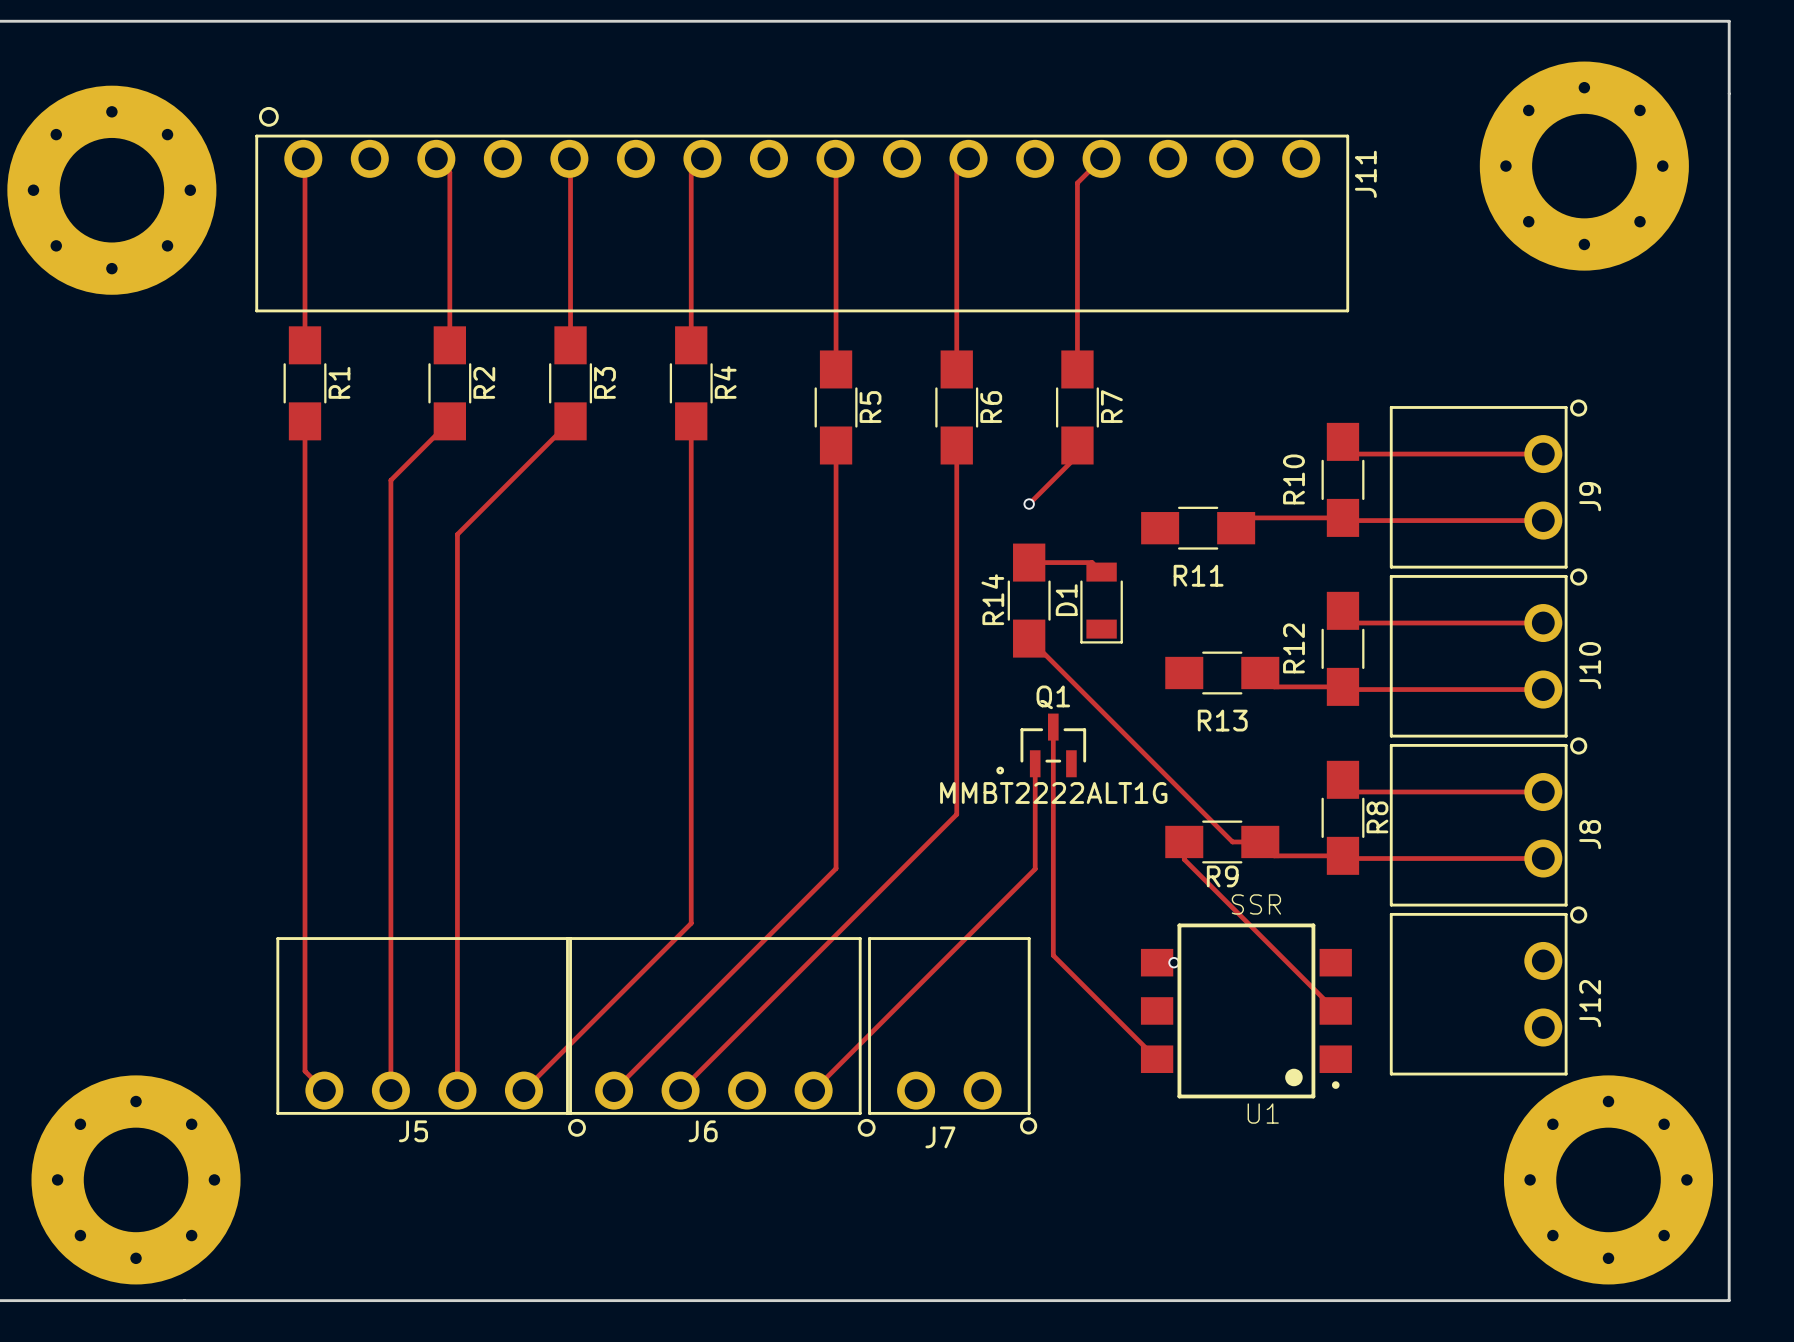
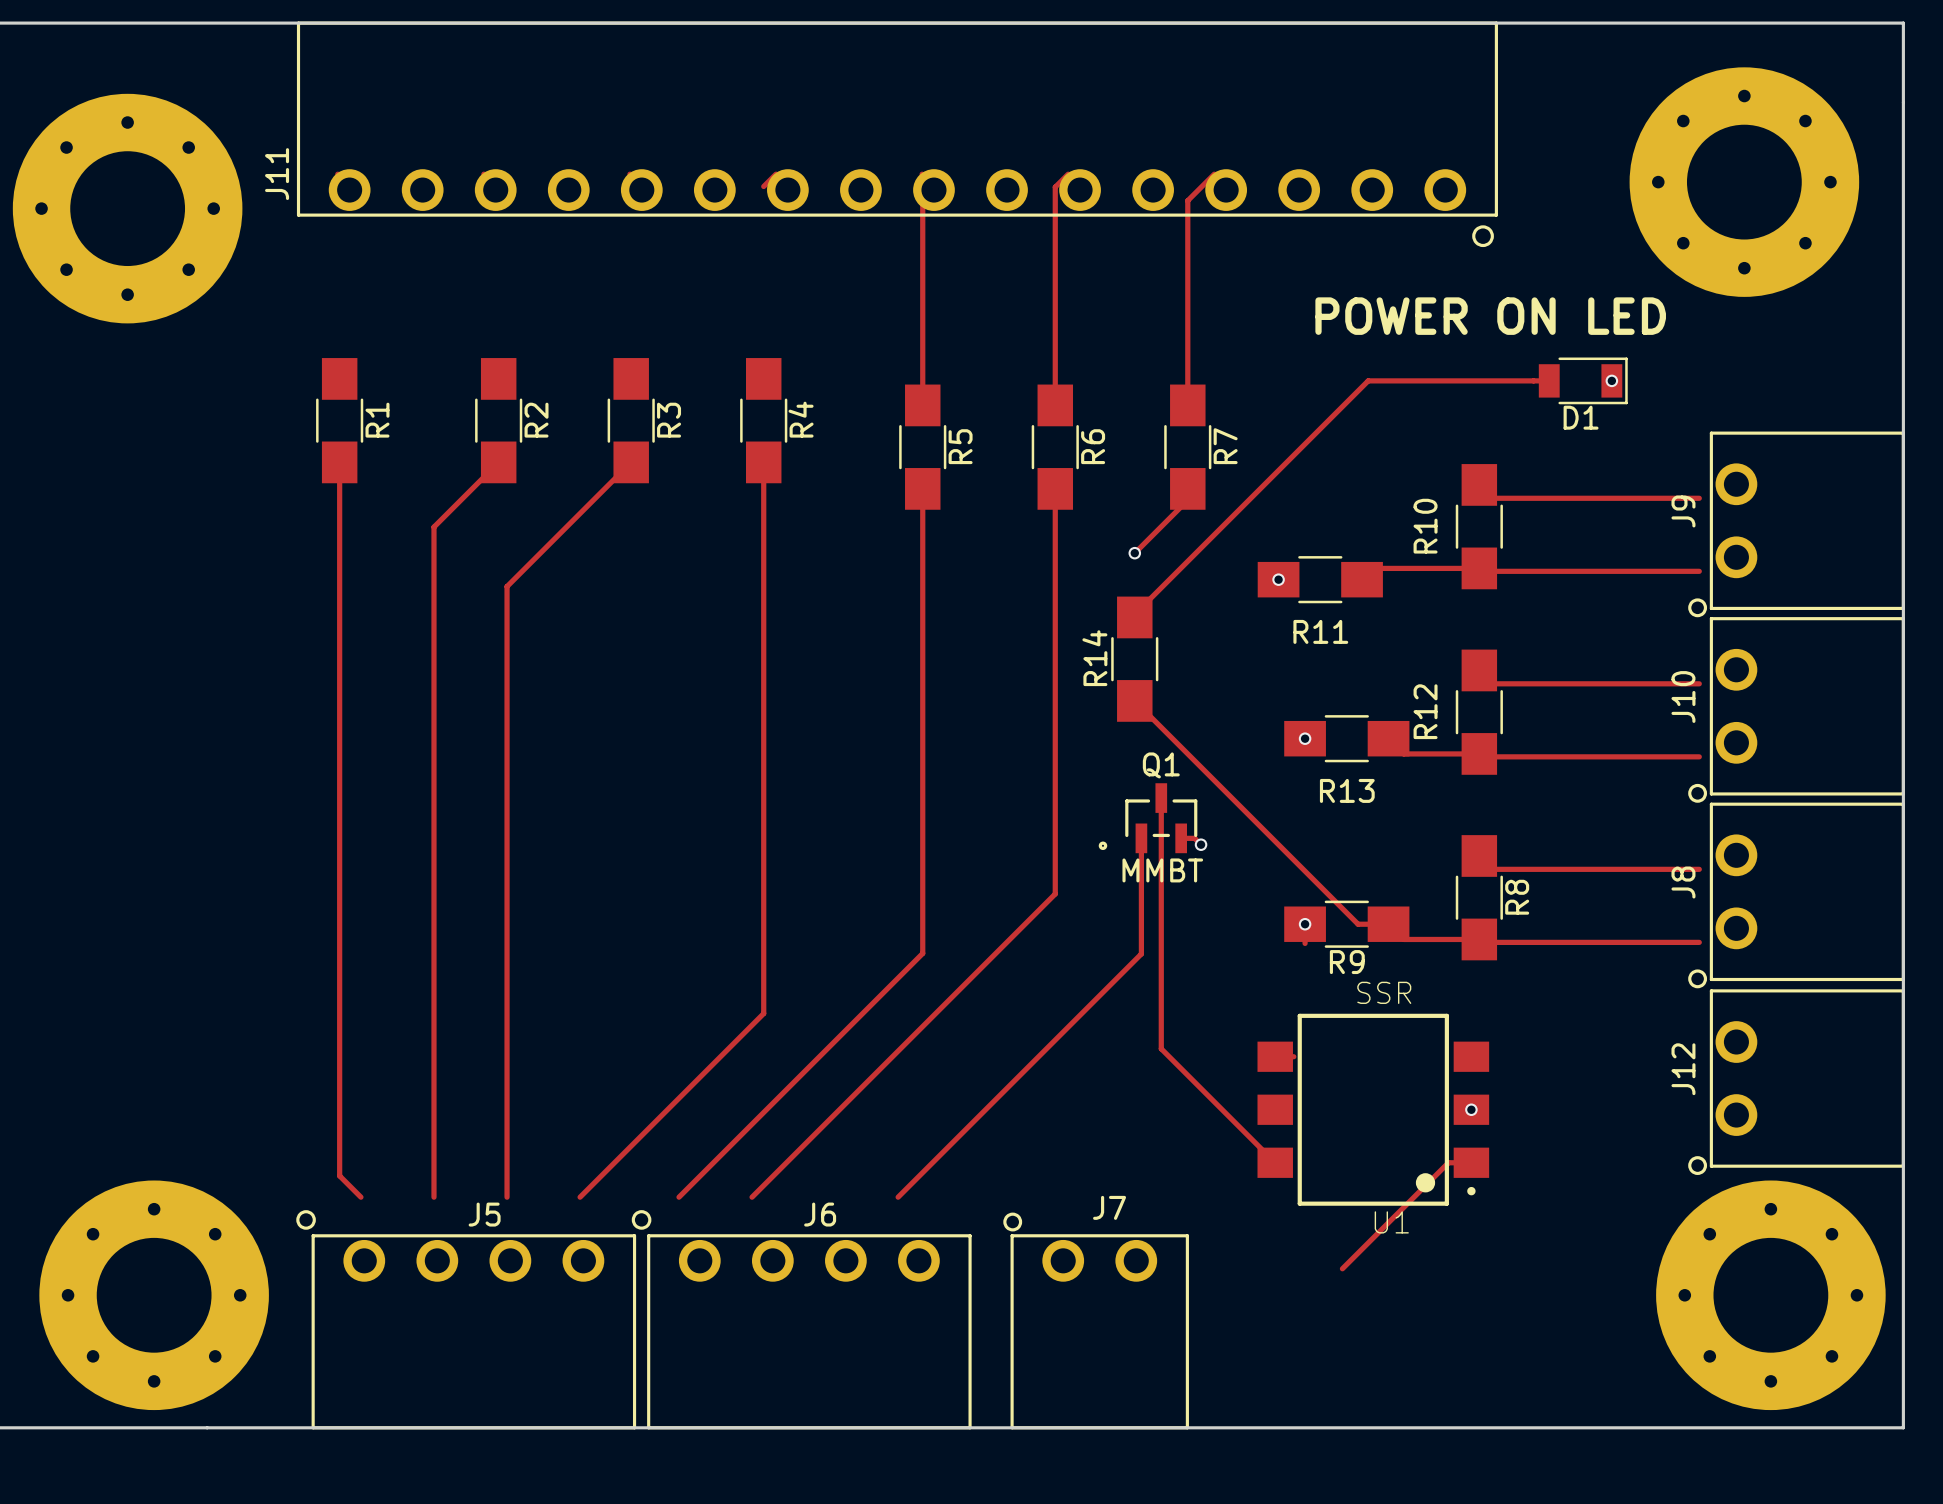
track: (305, 160) (305, 345) -> none
track: (570, 160) (570, 345) -> none
track: (691, 170) (691, 345) -> none
track: (449, 172) (449, 345) -> none
J11 rotation: 0° (802, 209) -> 180° (897, 134)
text: none -> POWER ON LED (1490, 316)
via: none -> (1611, 380)
J9 rotation: 0° (1488, 484) -> 180° (1796, 524)
J9 position: (1488, 484) -> (1796, 524)
via: none -> (1278, 579)
track: (1029, 562) (1092, 562) (1101, 572) -> (1134, 617) (1134, 614) (1368, 380) (1549, 380)
D1 rotation: 0° (1101, 603) -> 90° counterclockwise (1583, 380)
D1 position: (1101, 603) -> (1583, 380)
J10 rotation: 0° (1488, 652) -> 180° (1796, 709)
J10 position: (1488, 652) -> (1796, 709)
via: none -> (1305, 738)
track: none -> (1181, 838) (1194, 838) (1201, 844)
via: none -> (1201, 844)
Q1 value: MMBT2222ALT1G (1053, 792) -> MMBT (1162, 870)
J8 rotation: 0° (1488, 821) -> 180° (1796, 895)
J8 position: (1488, 821) -> (1796, 895)
via: none -> (1305, 924)
track: (1184, 859) (1335, 1010) -> none
via: (1174, 962) -> none
J12 rotation: 0° (1488, 990) -> 180° (1796, 1082)
J12 position: (1488, 990) -> (1796, 1082)
via: none -> (1471, 1109)
J7 rotation: 0° (952, 1035) -> 180° (1096, 1320)
J7 position: (952, 1035) -> (1096, 1320)
J5 rotation: 0° (431, 1036) -> 180° (466, 1319)
J6 rotation: 0° (720, 1036) -> 180° (801, 1319)
track: none -> (1471, 1162) (1448, 1162) (1342, 1268)

